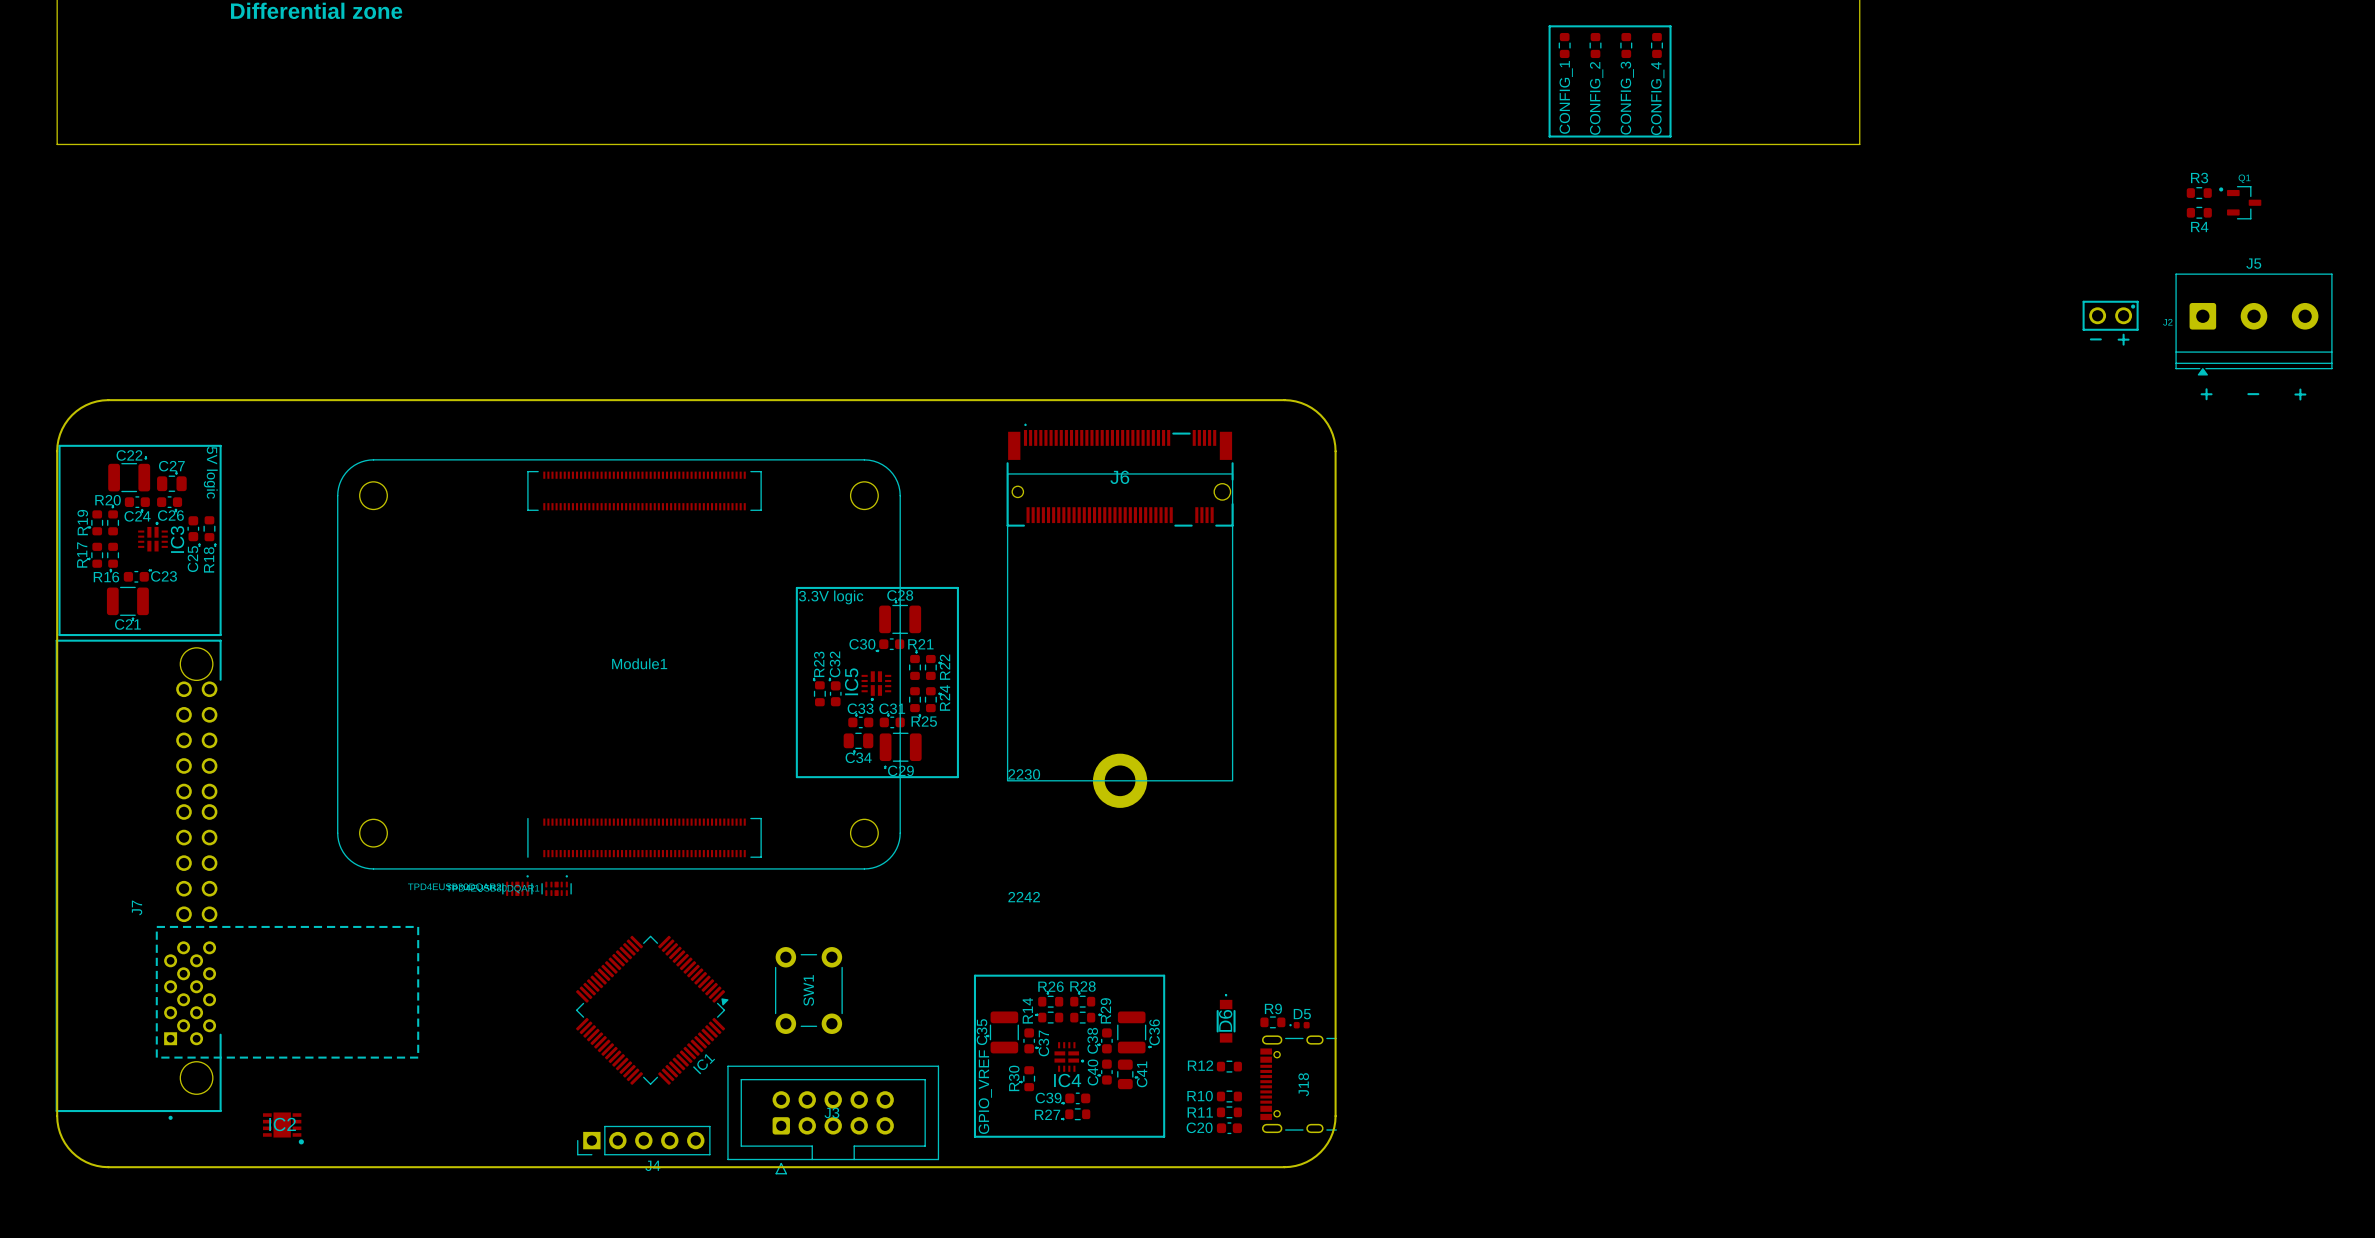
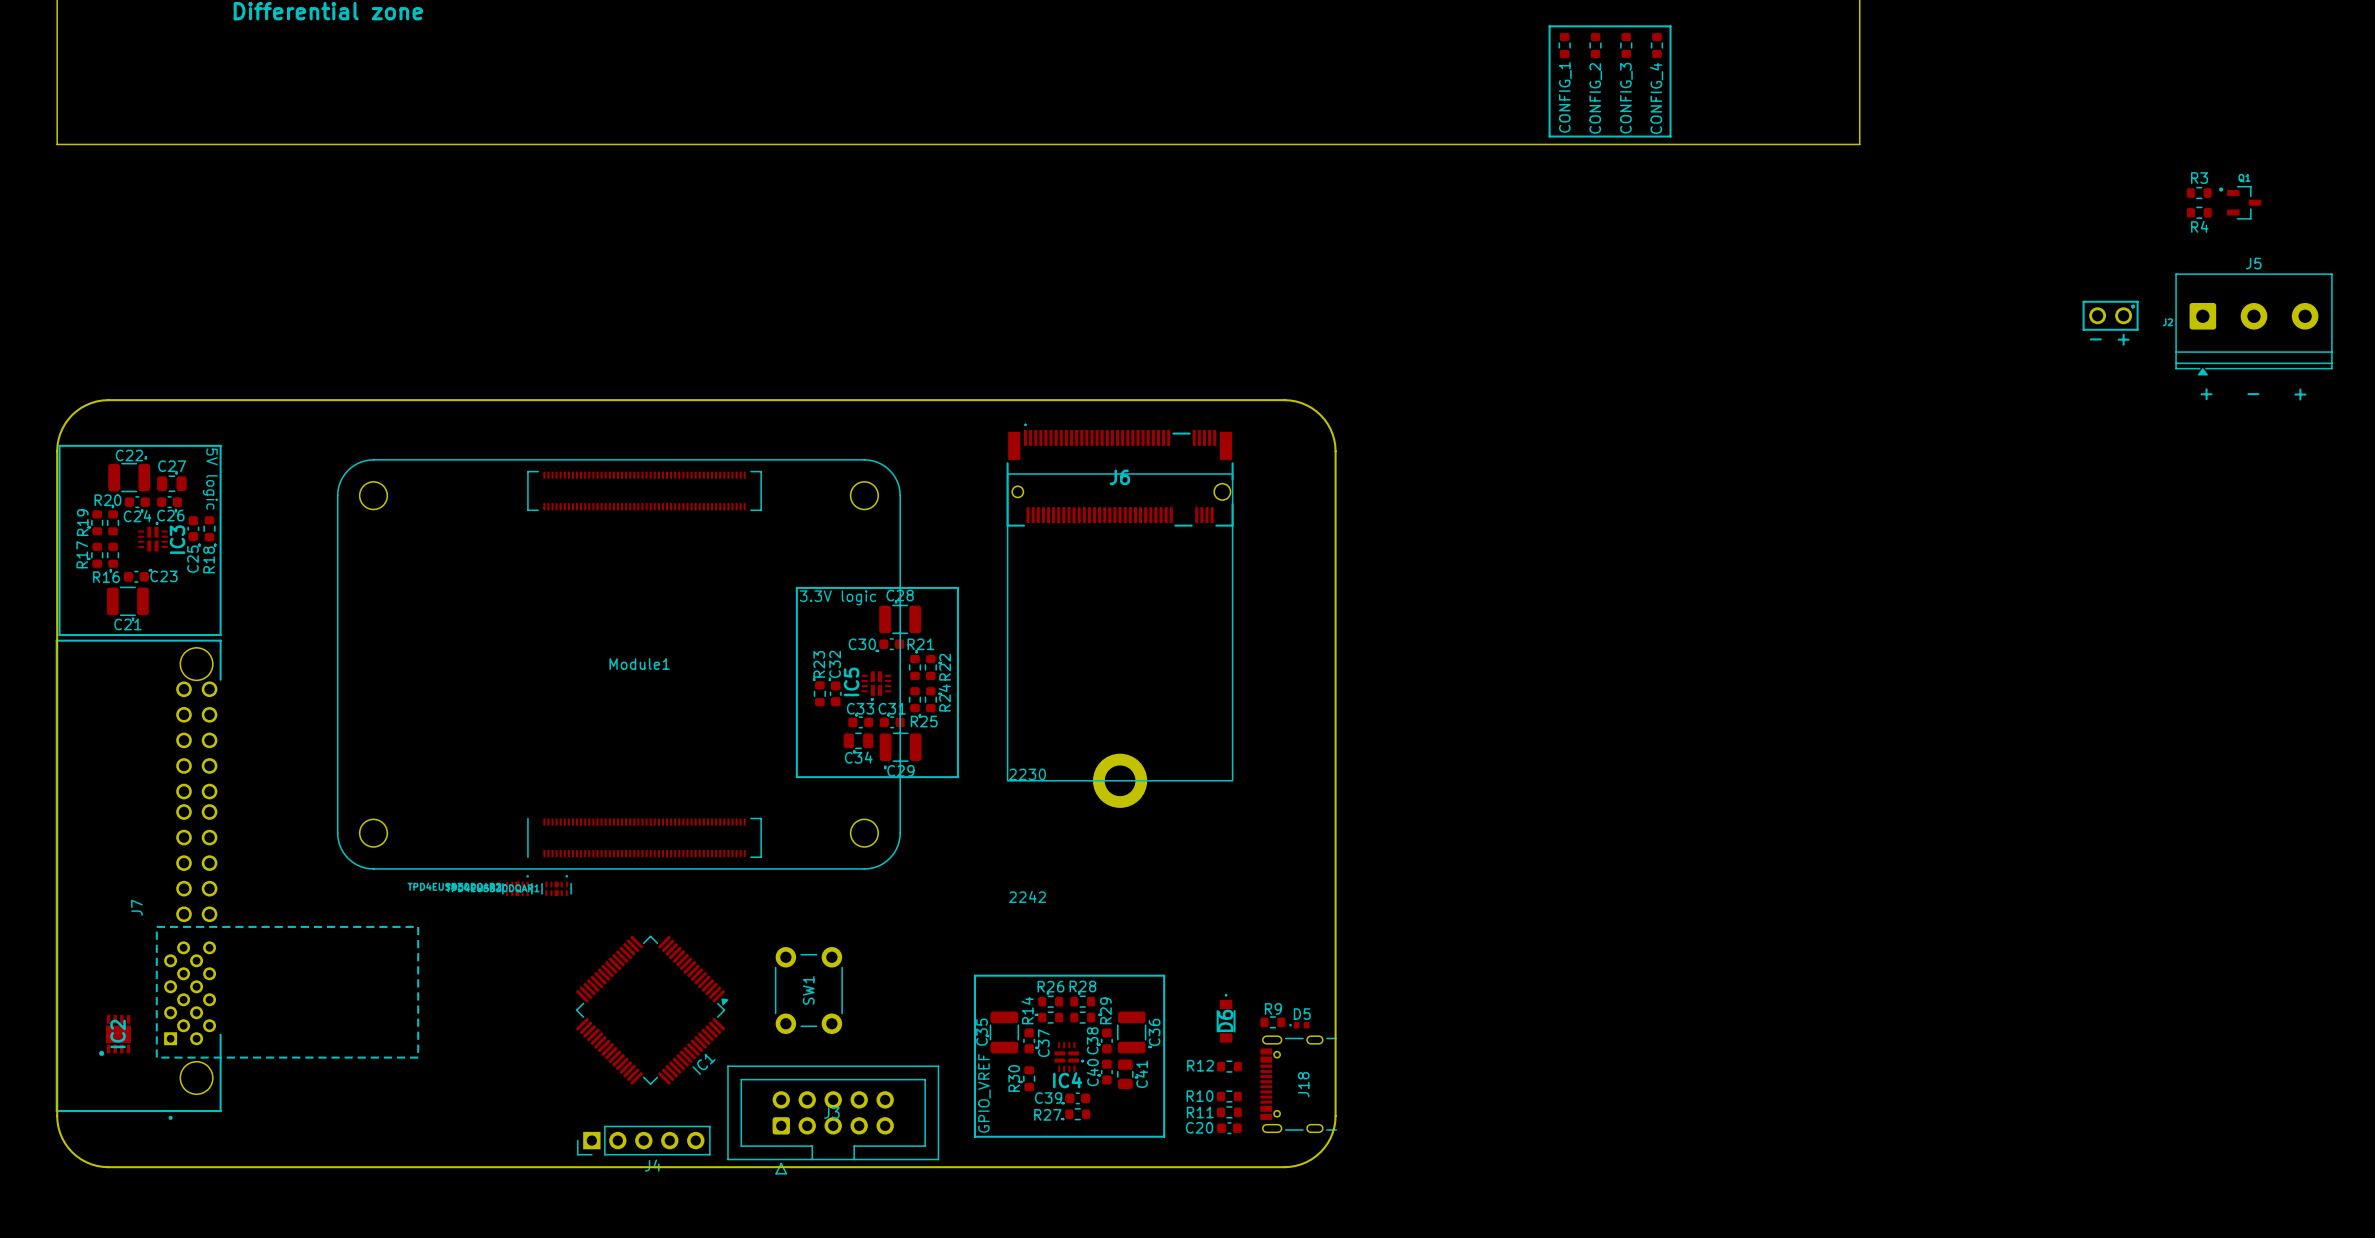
IC2 rotation: 0° (283, 1128) -> 90° clockwise (115, 1035)
IC2 position: (283, 1128) -> (115, 1035)

